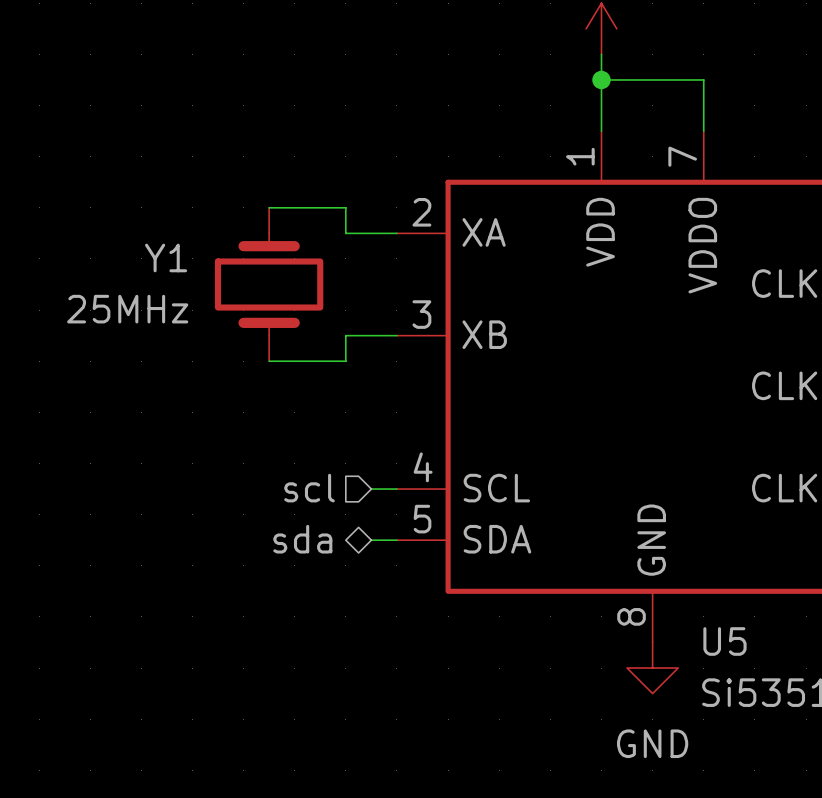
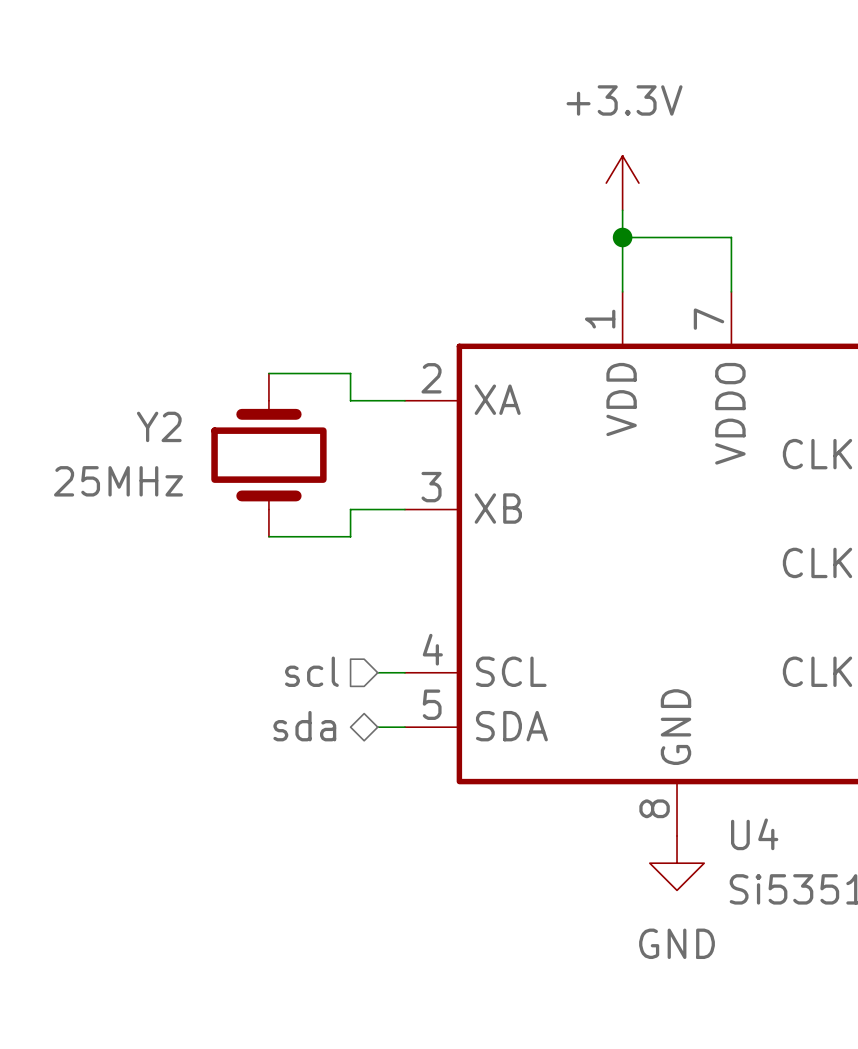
Y1 name: Y1 (166, 257) -> Y2 (159, 426)
U5 name: U5 (724, 641) -> U4 (754, 834)

